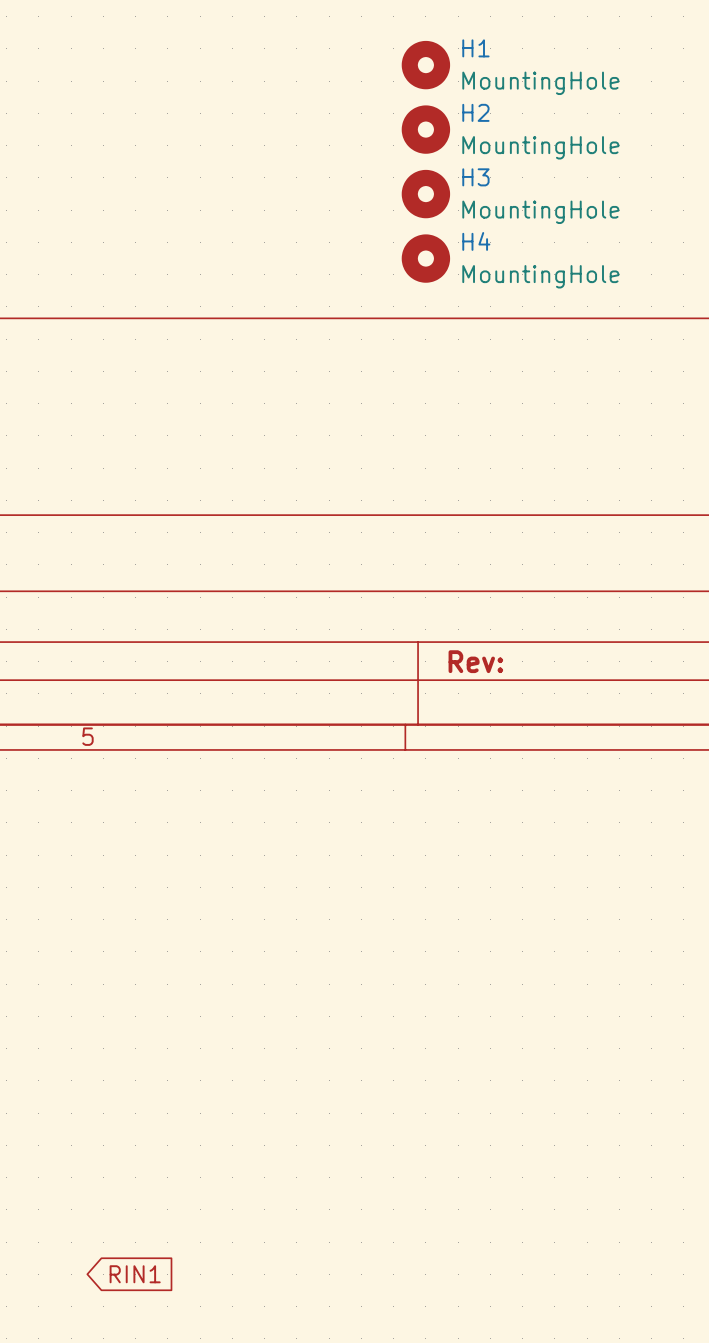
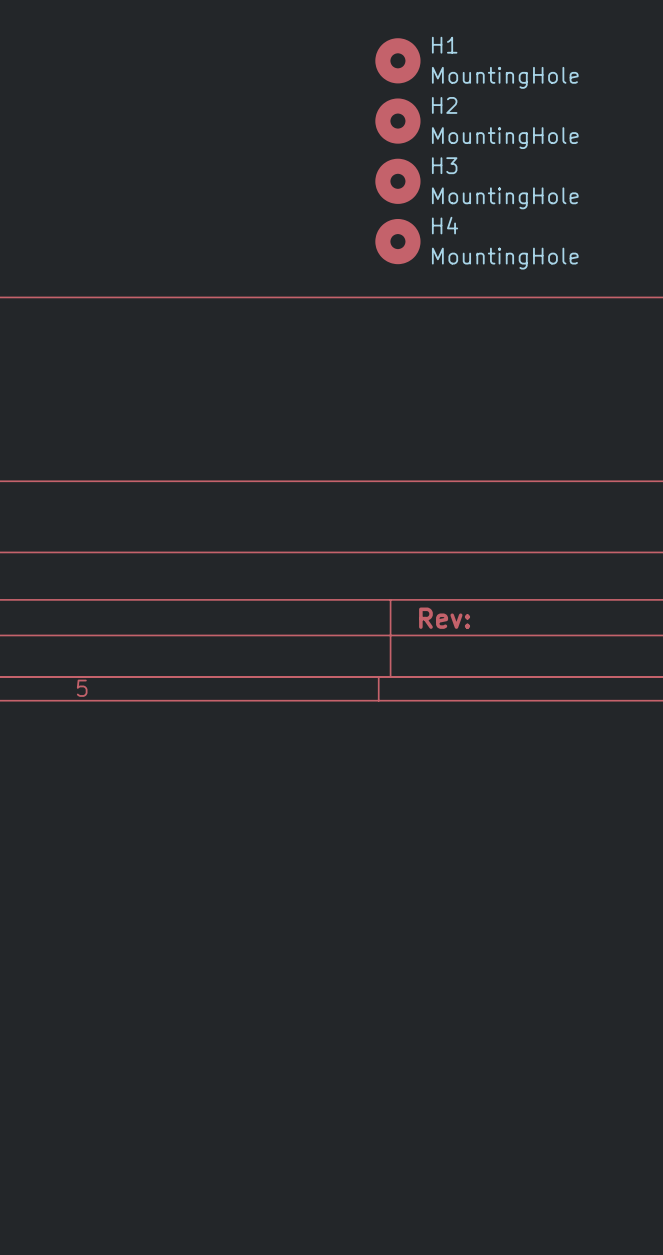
global label: RIN1 (135, 1274) -> none

